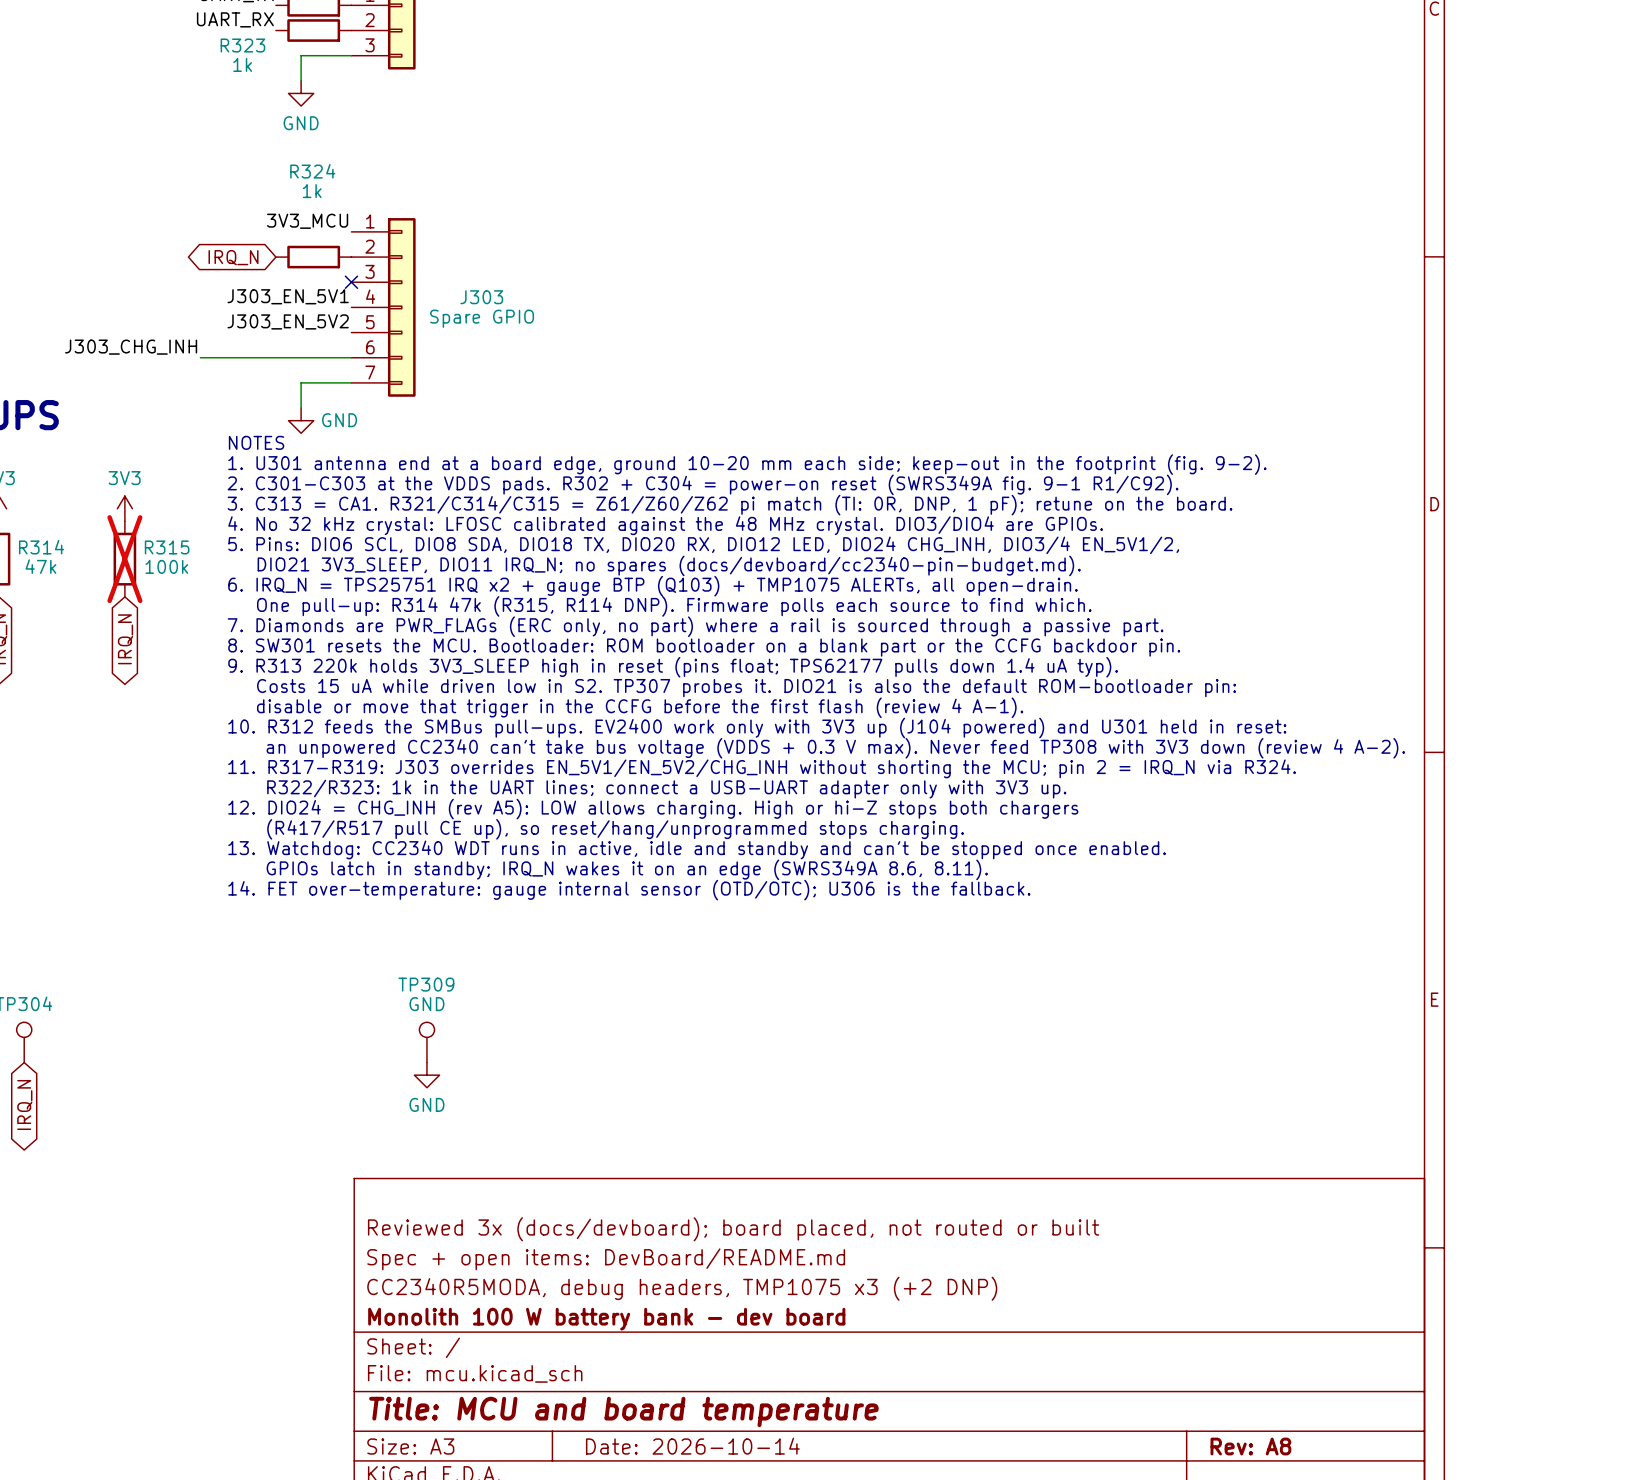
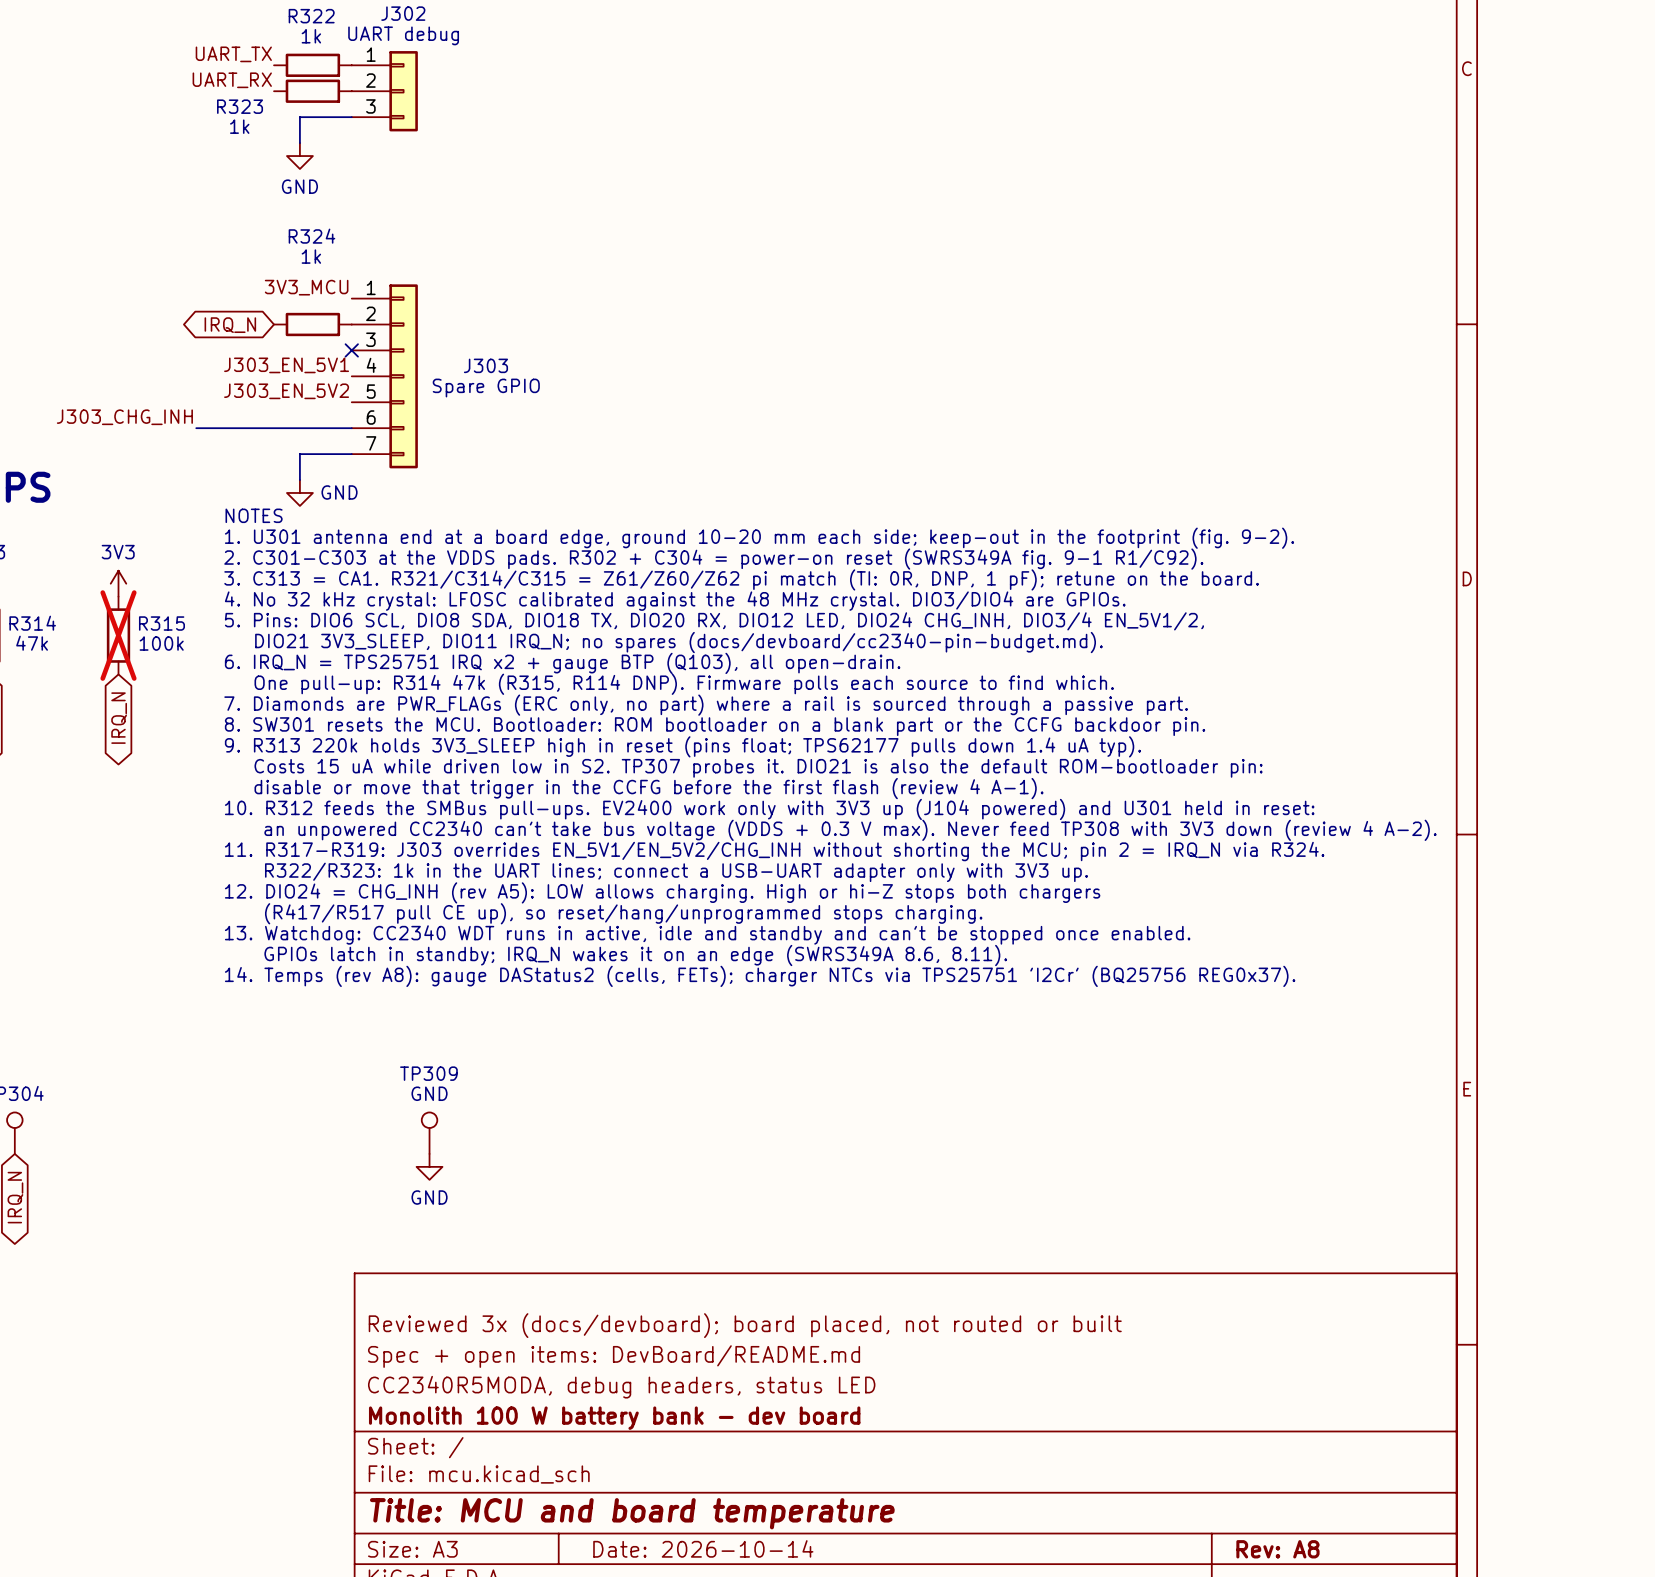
text: 6. IRQ_N = TPS25751 IRQ x2 + gauge BTP (Q103) + TMP1075 ALERTs, all open-drain. (653, 586) -> 6. IRQ_N = TPS25751 IRQ x2 + gauge BTP (Q103), all open-drain. (562, 663)
text: 14. FET over-temperature: gauge internal sensor (OTD/OTC); U306 is the fallback. (629, 890) -> 14. Temps (rev A8): gauge DAStatus2 (cells, FETs); charger NTCs via TPS25751 'I2Cr' (BQ25756 REG0x37). (760, 976)
title block: CC2340R5MODA, debug headers, TMP1075 x3 (+2 DNP) (682, 1288) -> CC2340R5MODA, debug headers, status LED (621, 1387)

